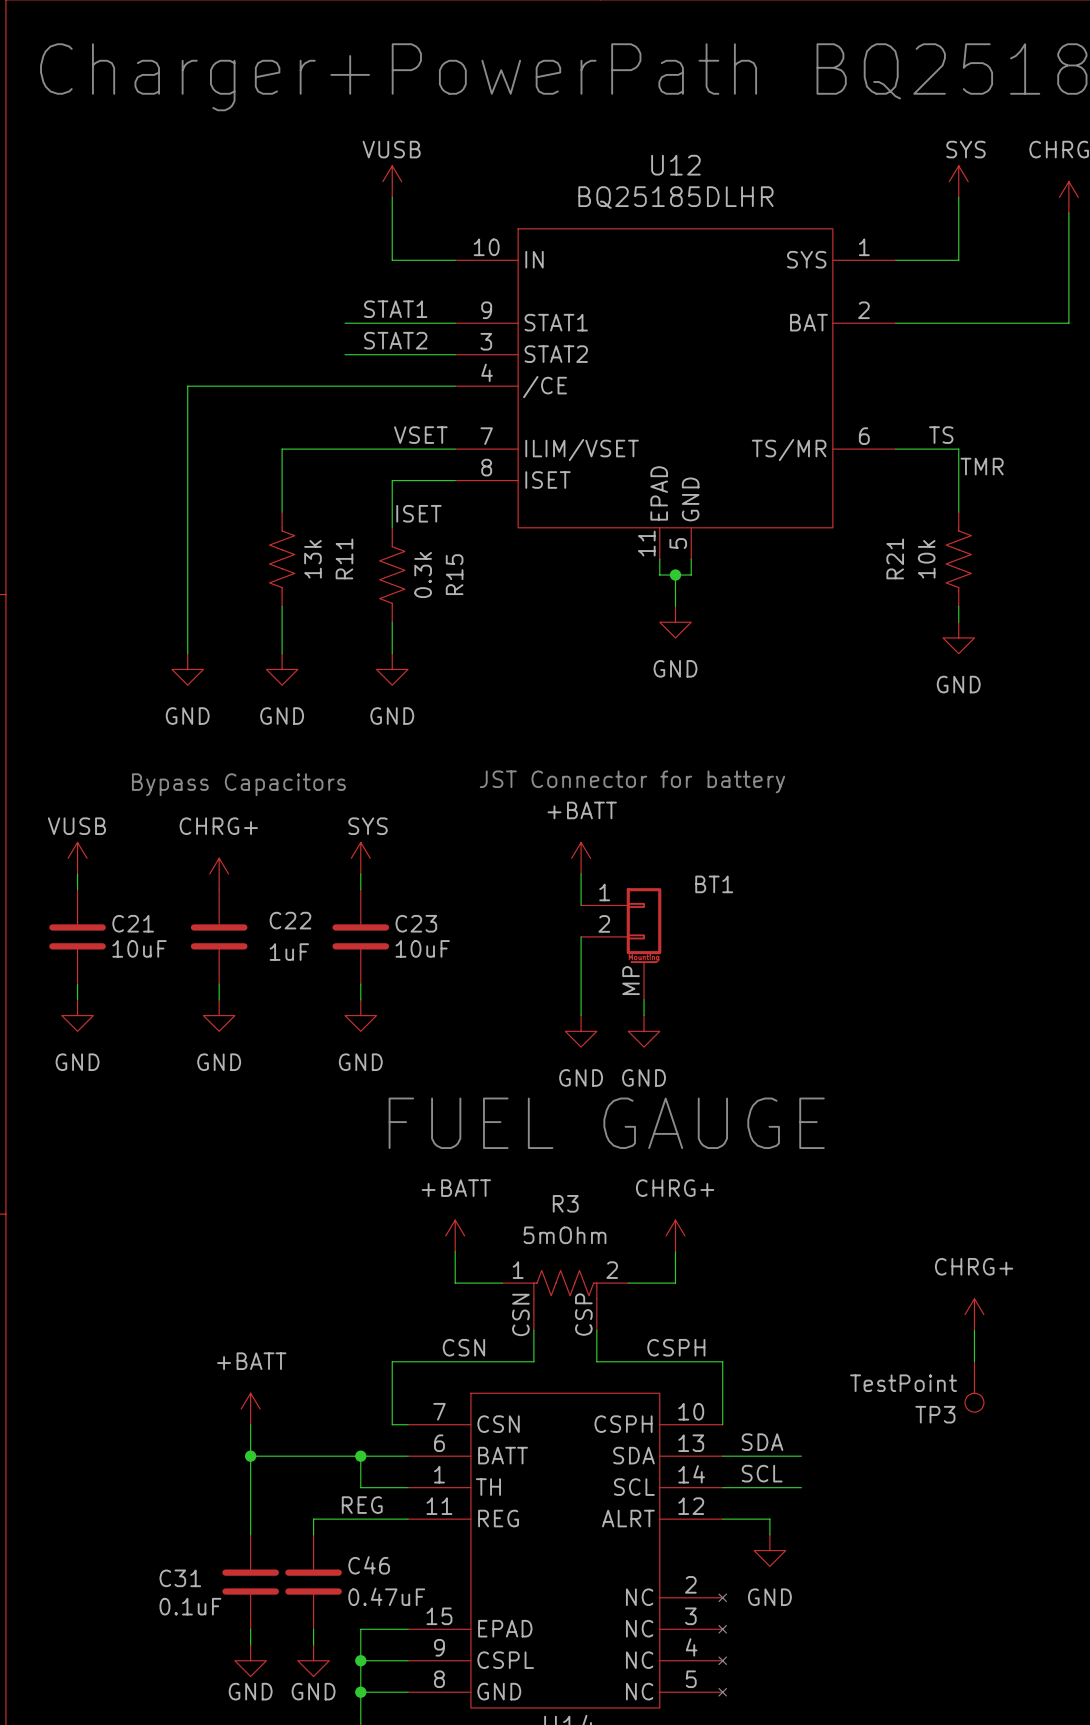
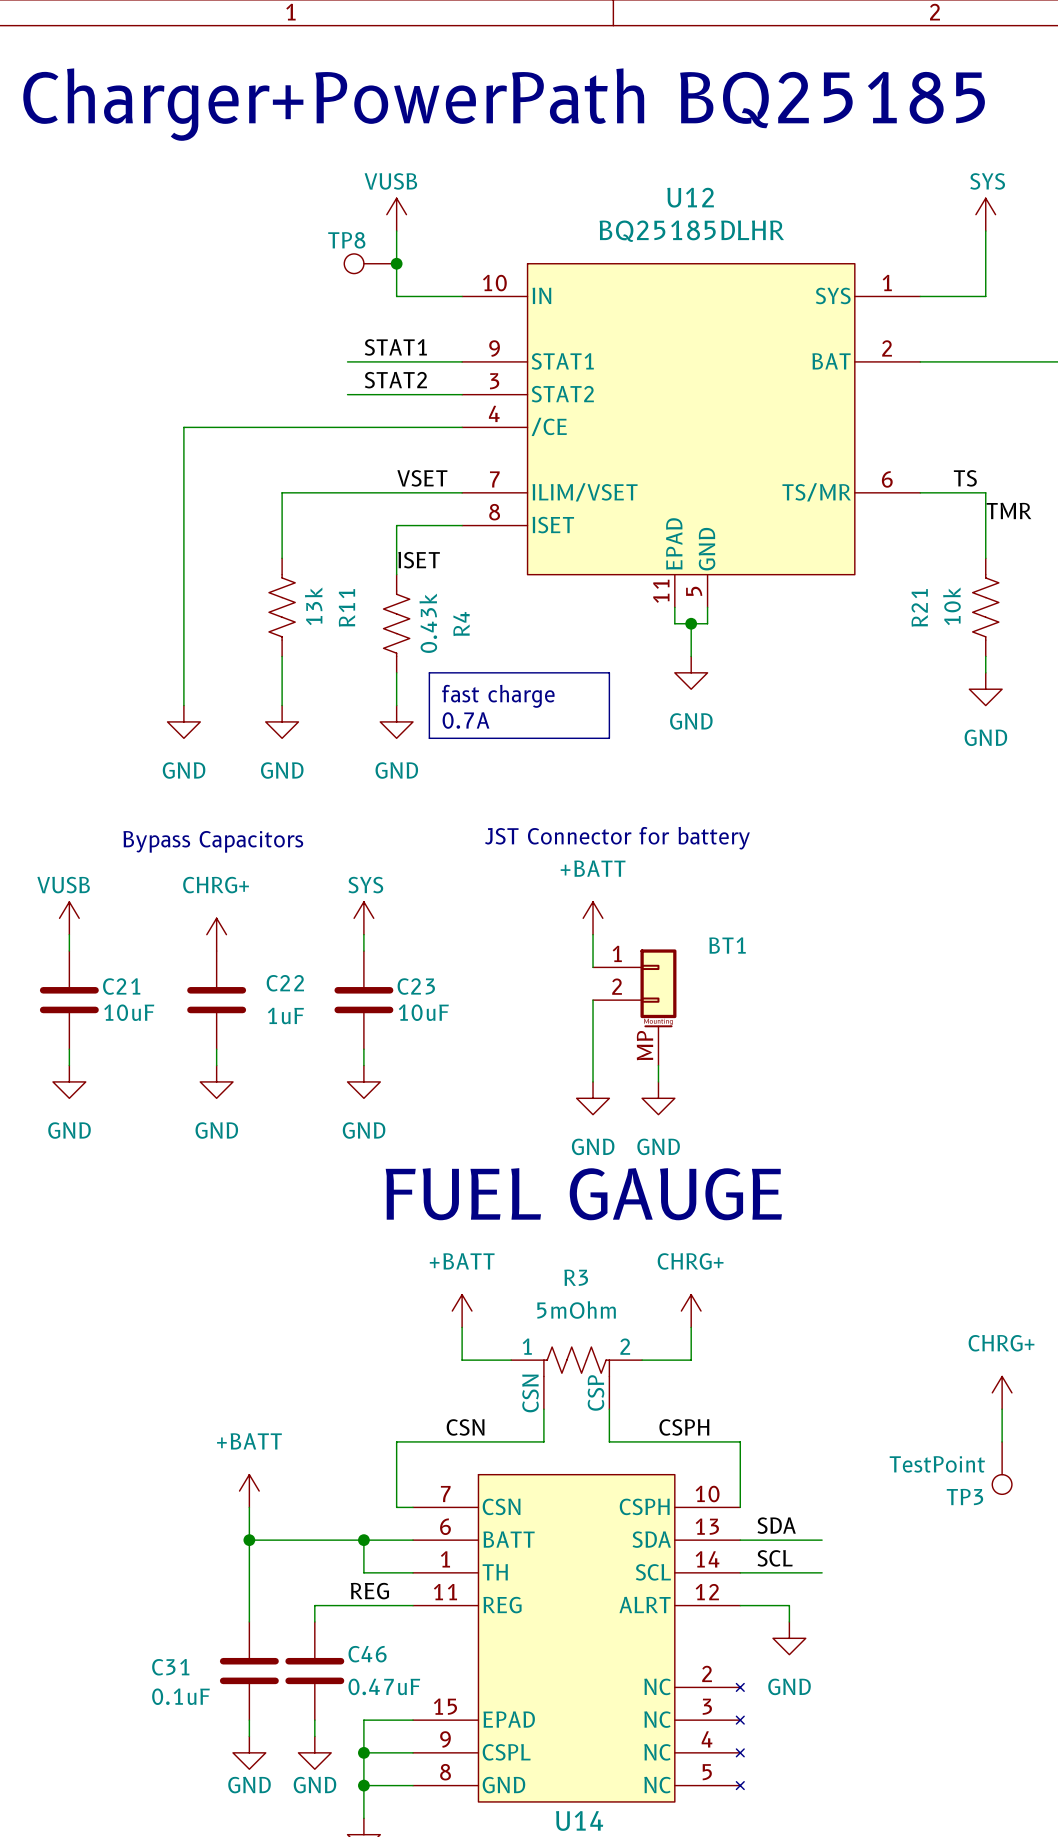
TP8: none -> (370, 263)
junction: none -> (396, 263)
R15 name: R15 (454, 574) -> R4 (461, 623)
R15 value: 0.3k (423, 575) -> 0.43k (428, 623)
line: none -> (429, 672) (609, 672) (609, 738) (429, 738) (429, 672)
text: none -> fast charge (498, 696)
text: none -> 0.7A (466, 720)

